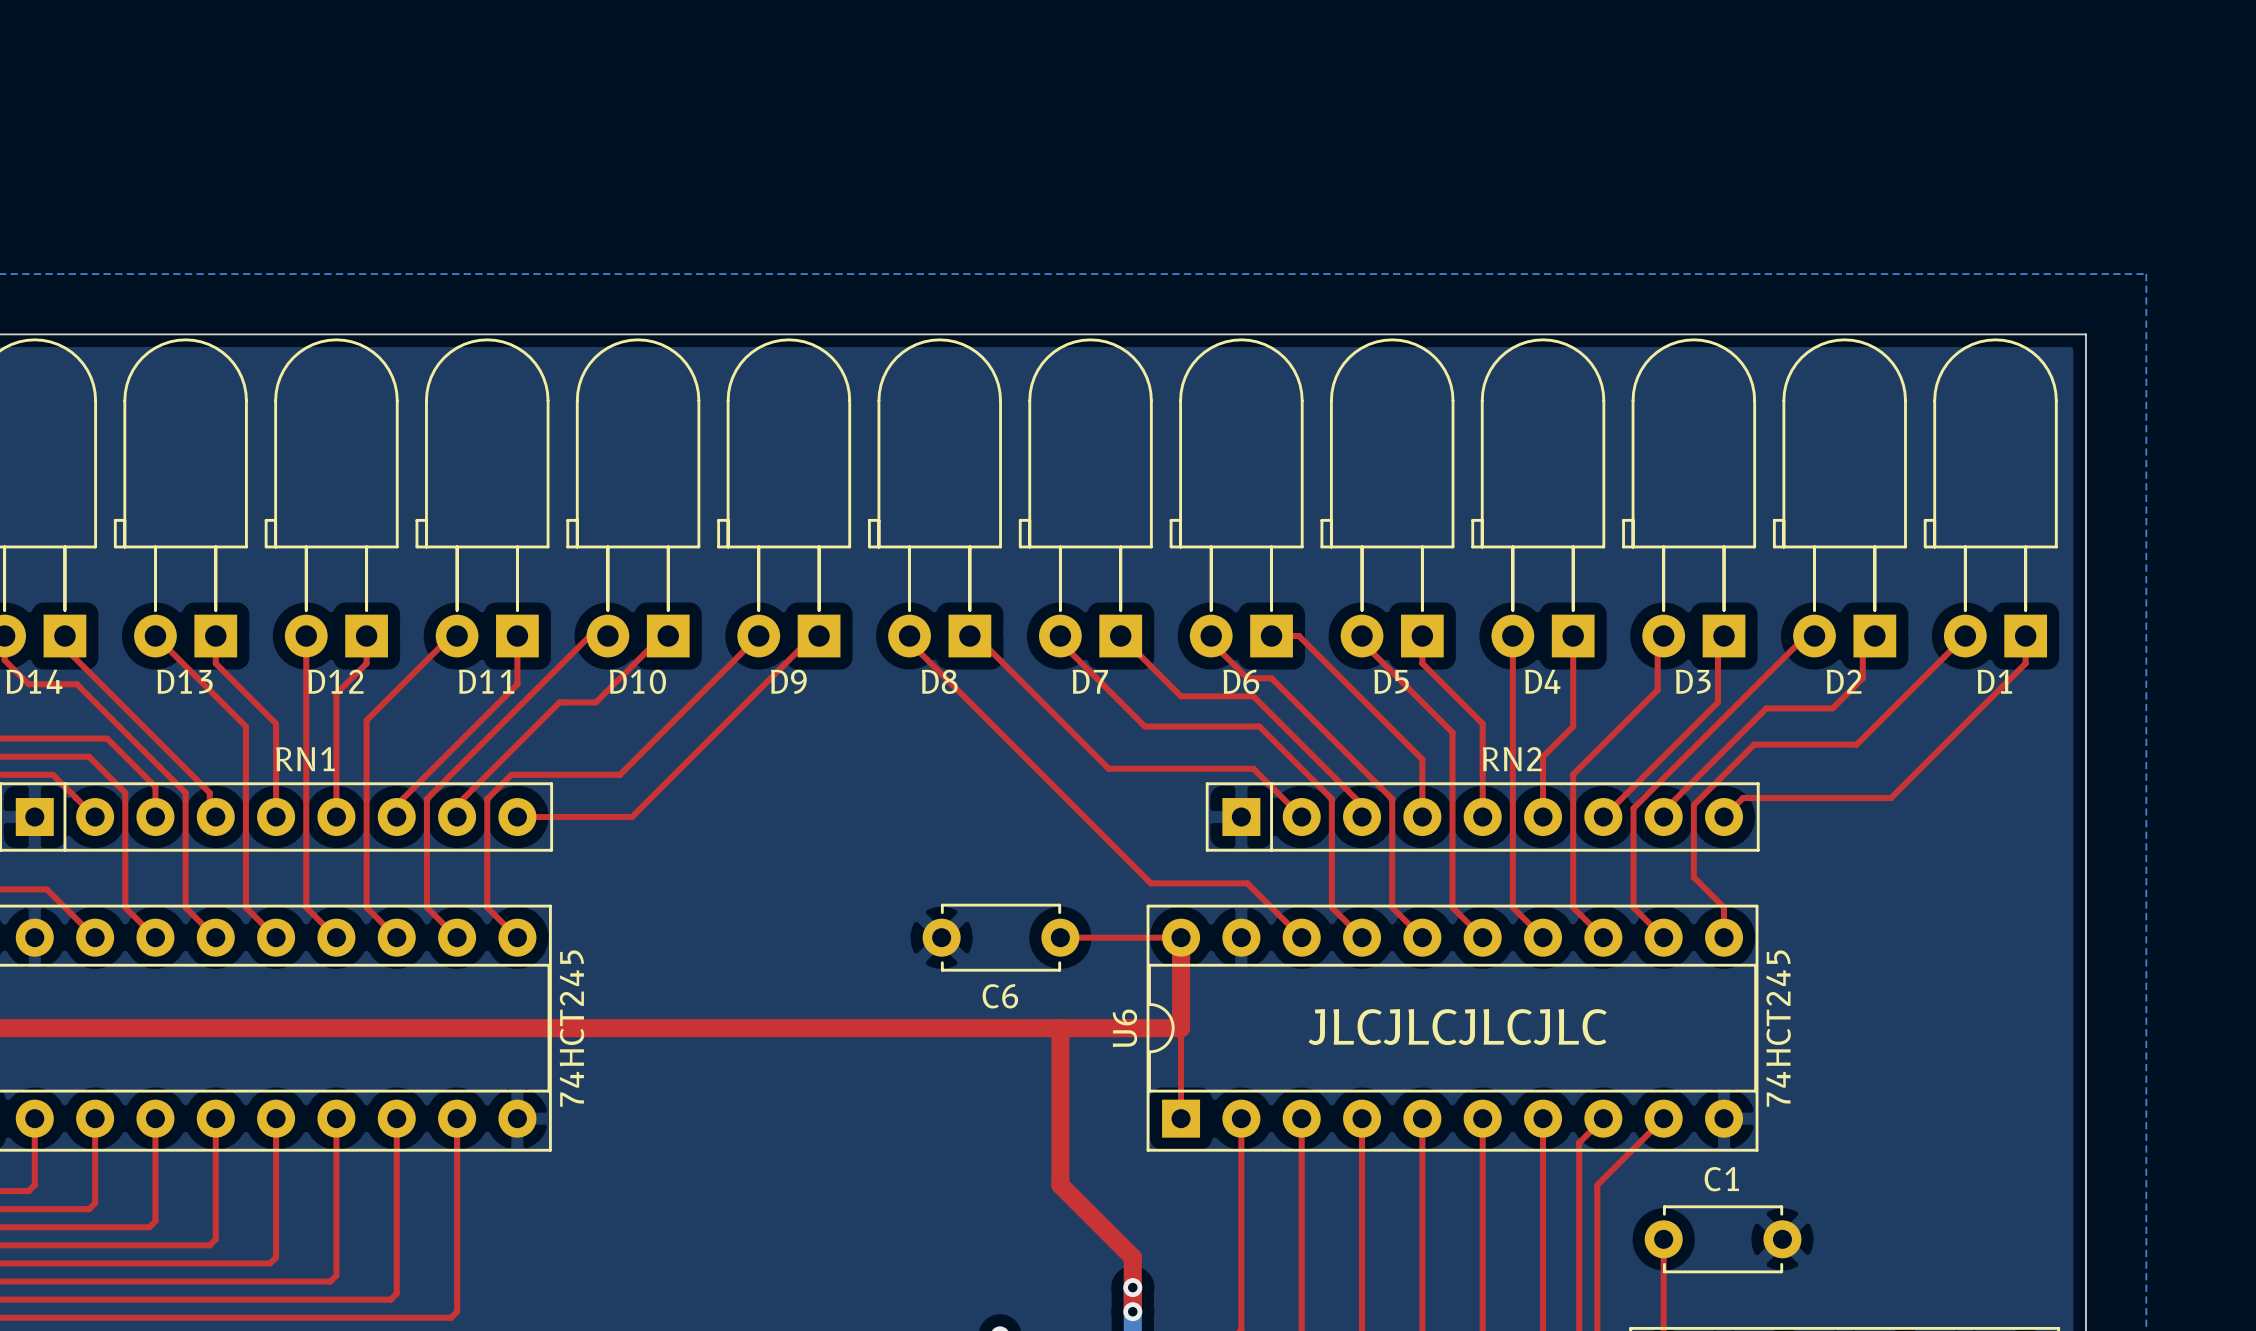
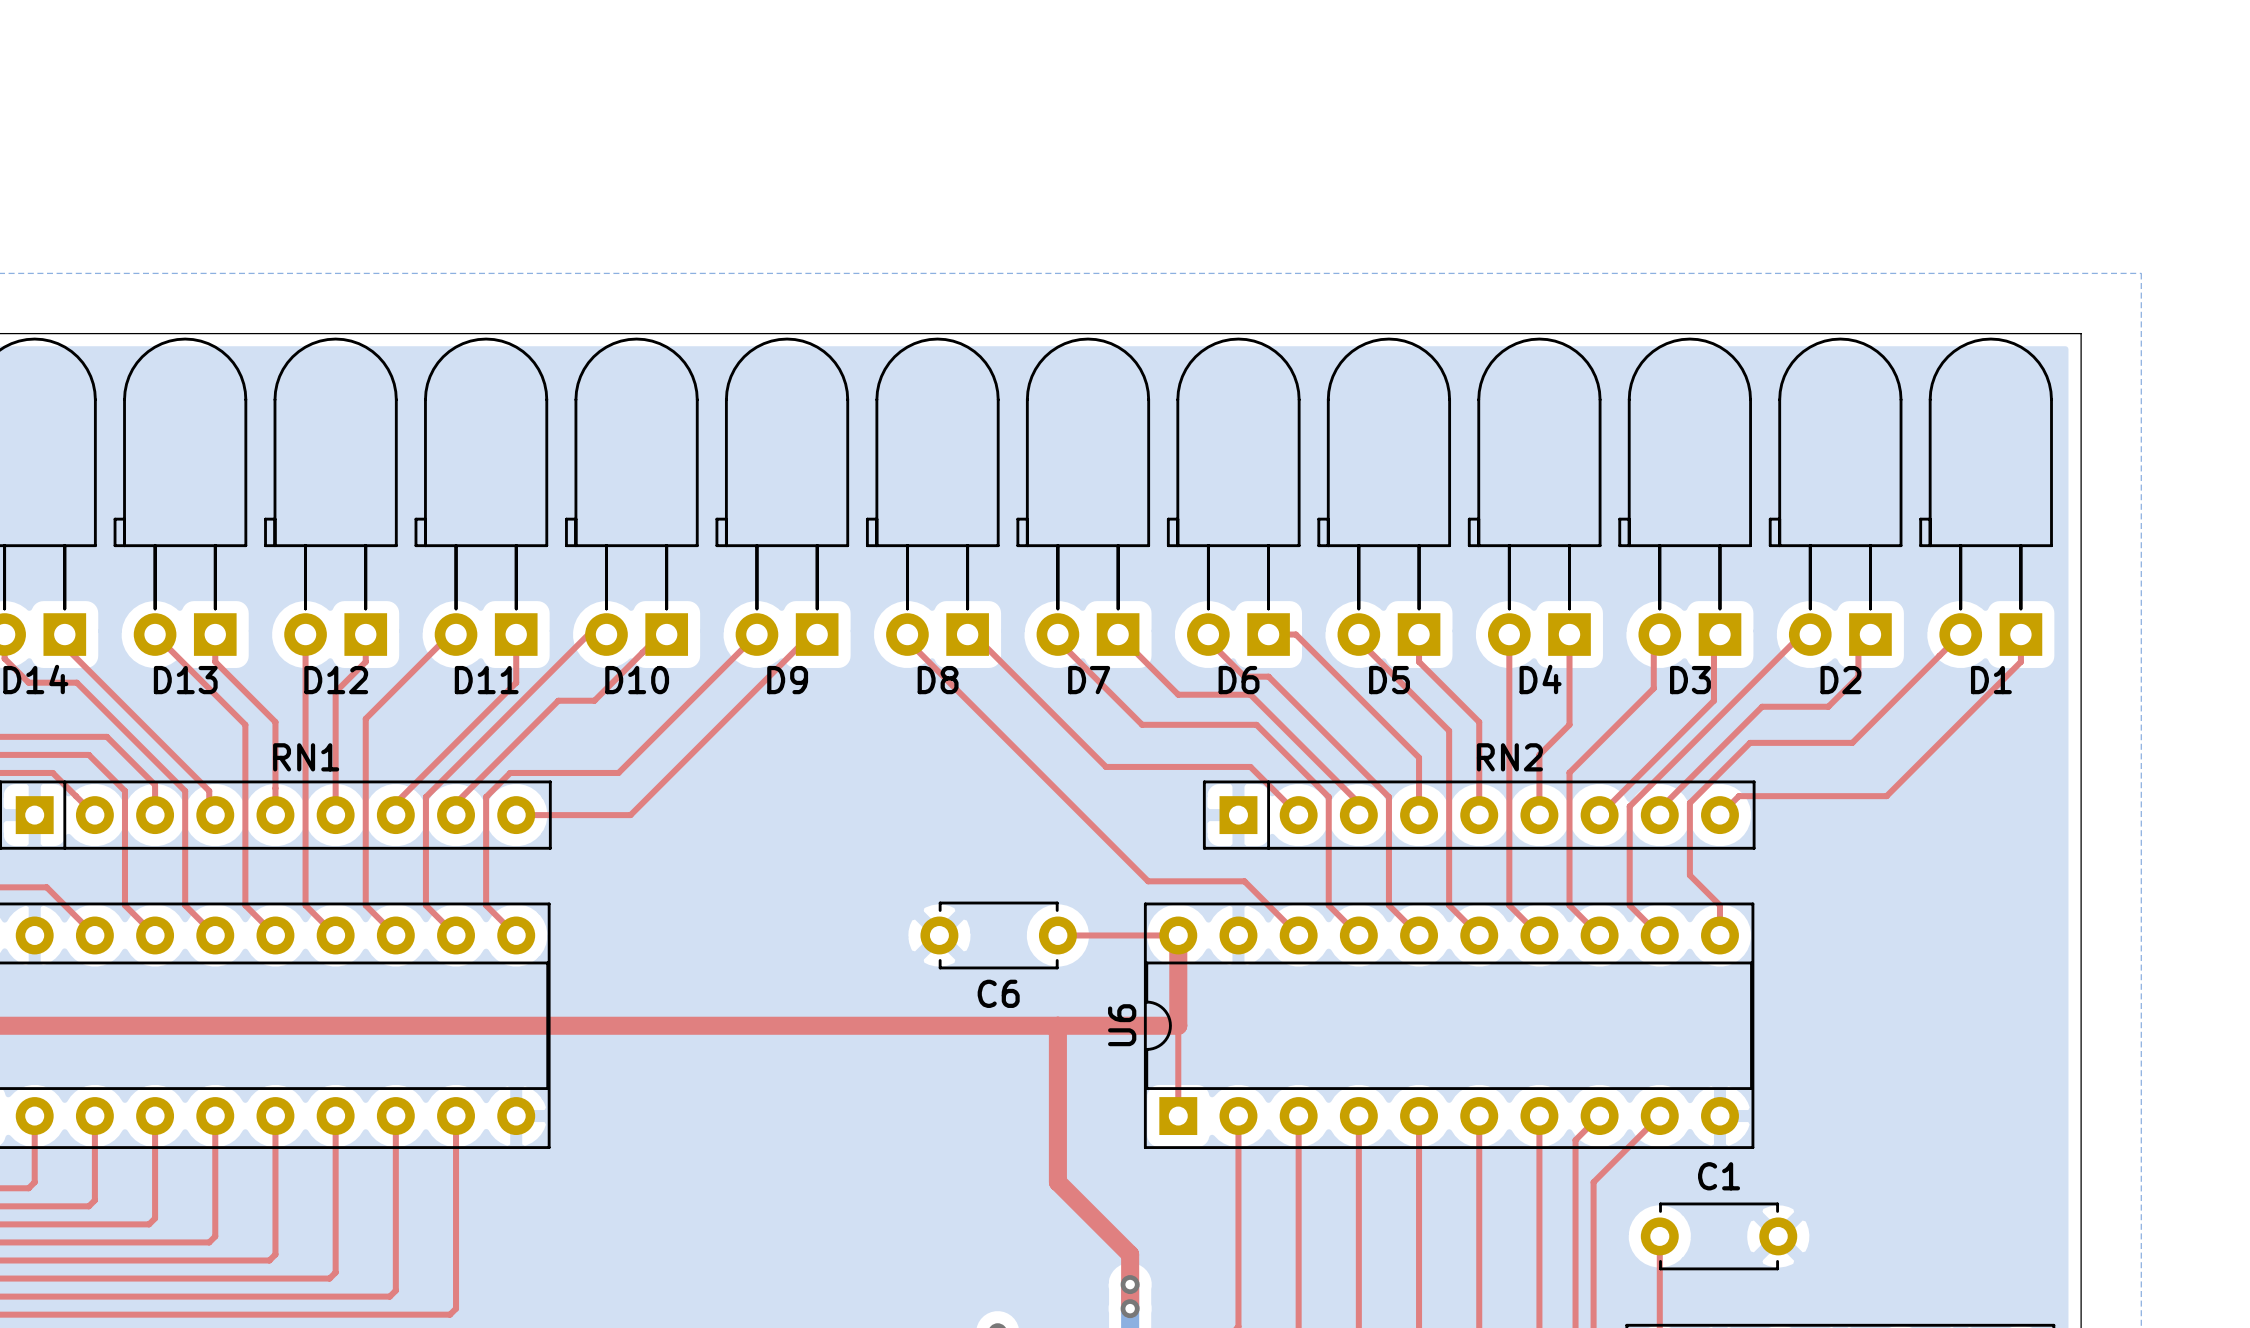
text: JLCJLCJLCJLC (1457, 1027) -> none
part value: 74HCT245 (572, 1028) -> none
U6 value: 74HCT245 (1778, 1028) -> none

